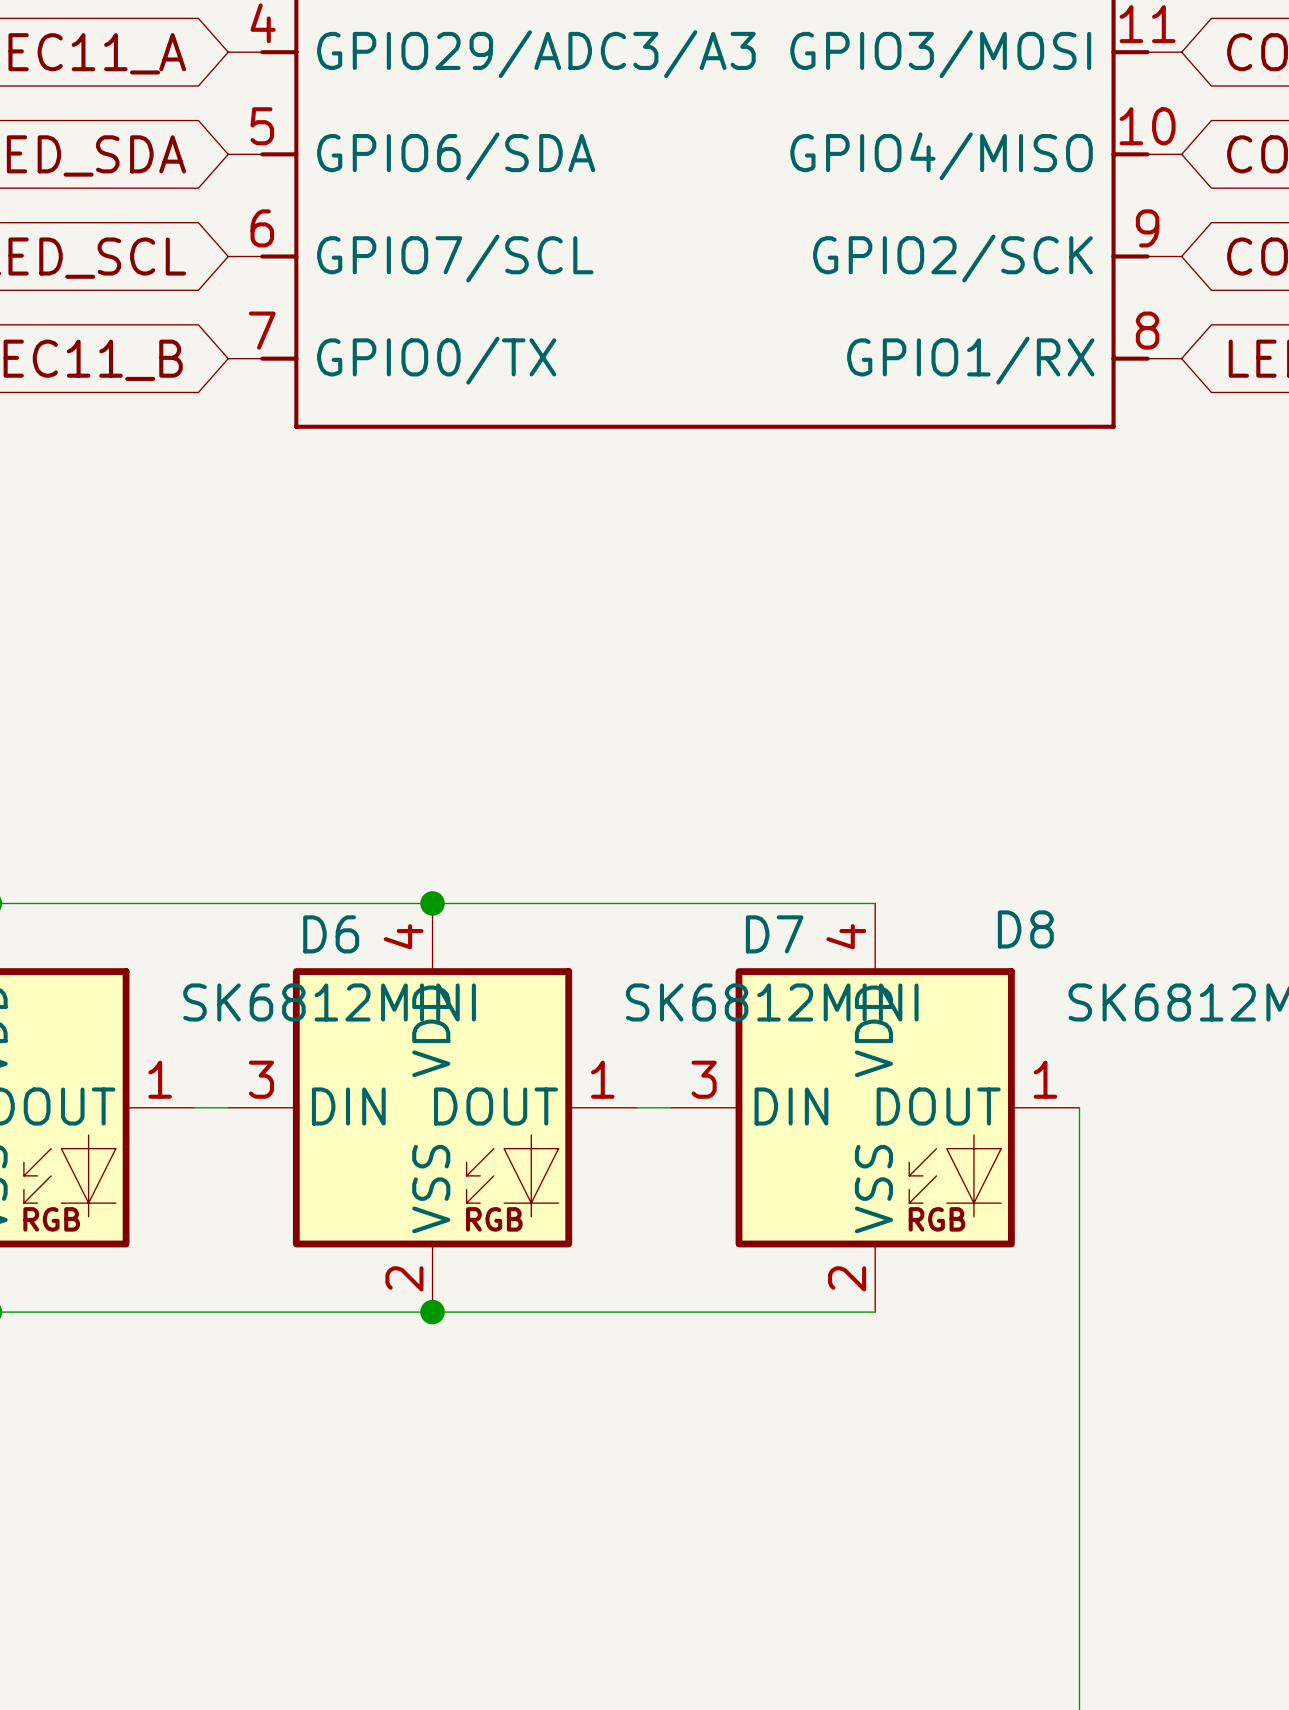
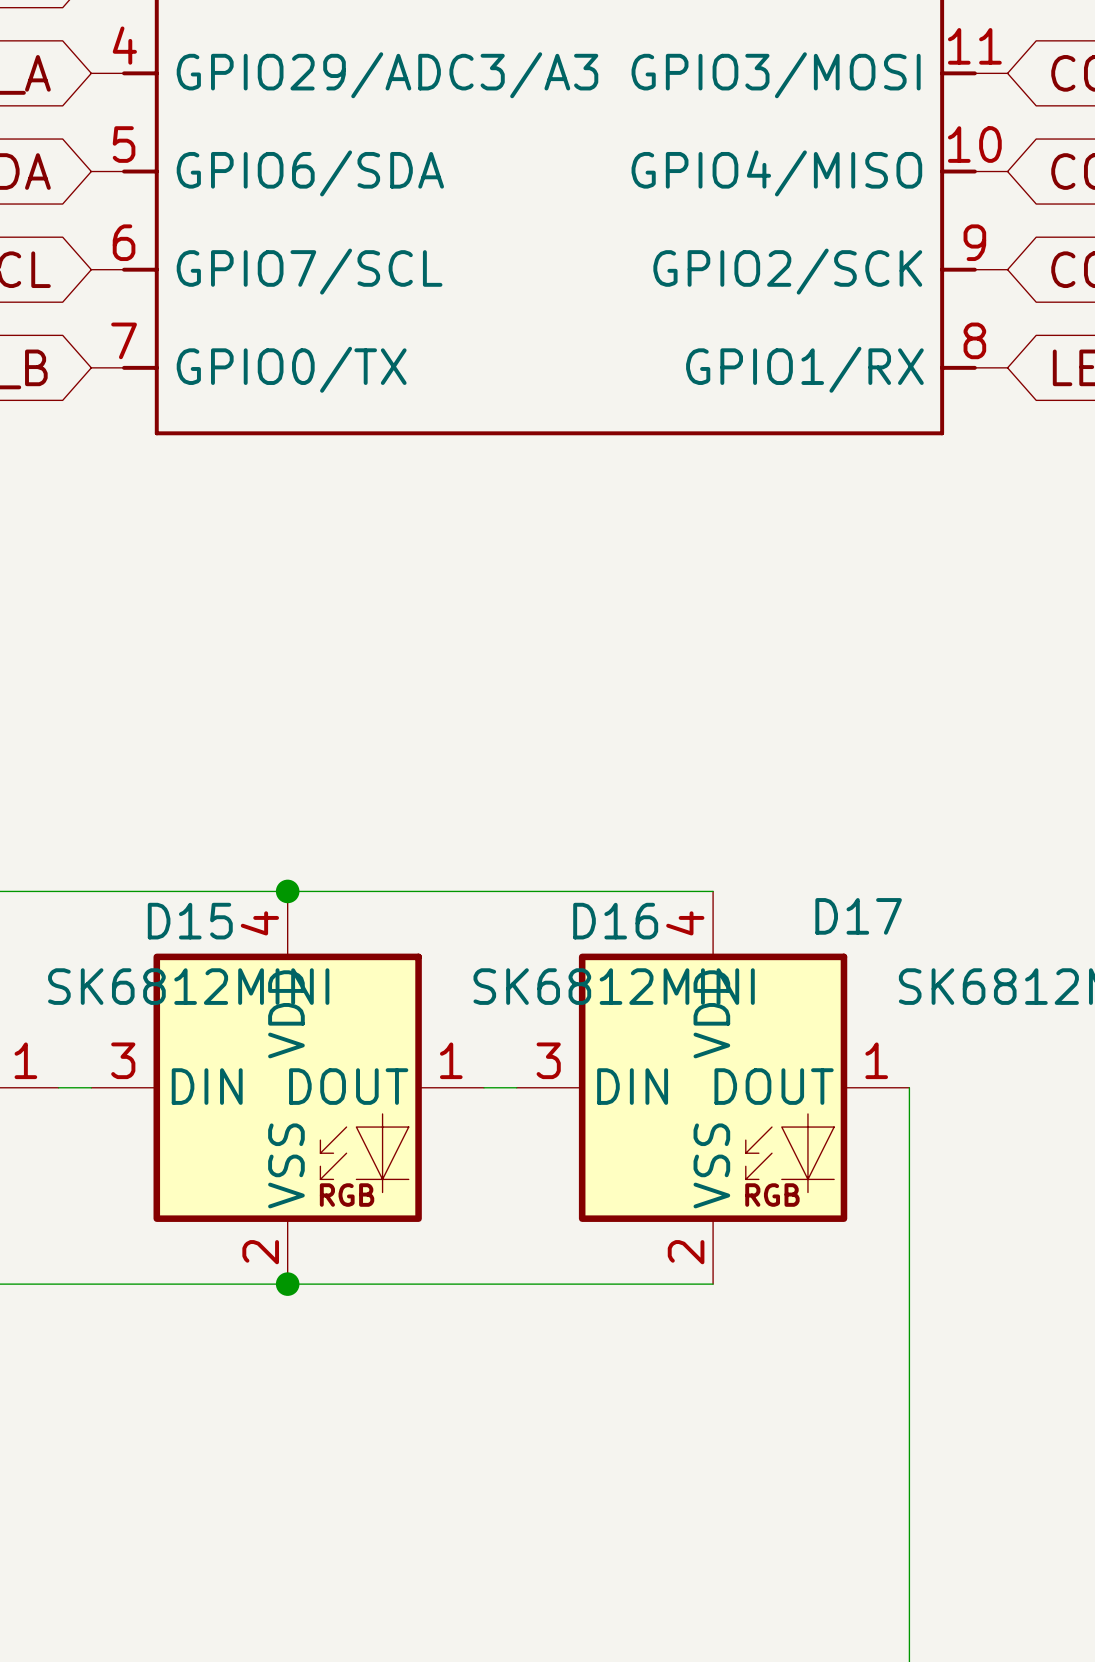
D8 name: D8 (1025, 929) -> D17 (858, 916)
D6 name: D6 (331, 934) -> D15 (190, 921)
D7 name: D7 (774, 934) -> D16 (615, 921)

